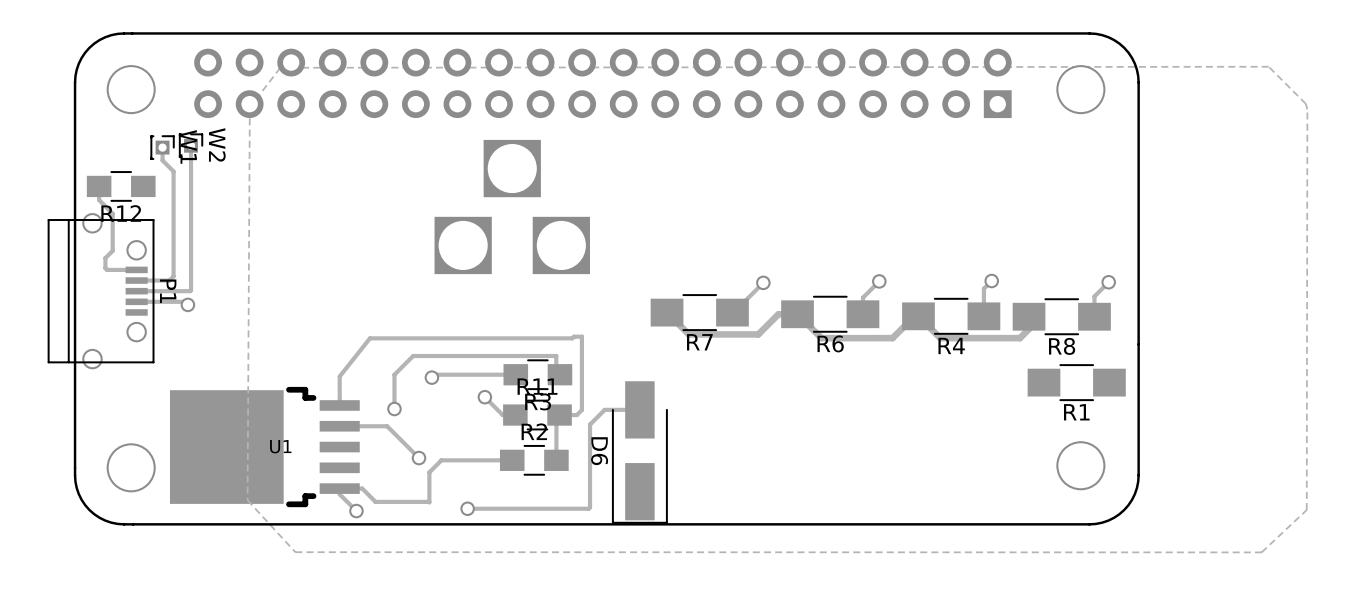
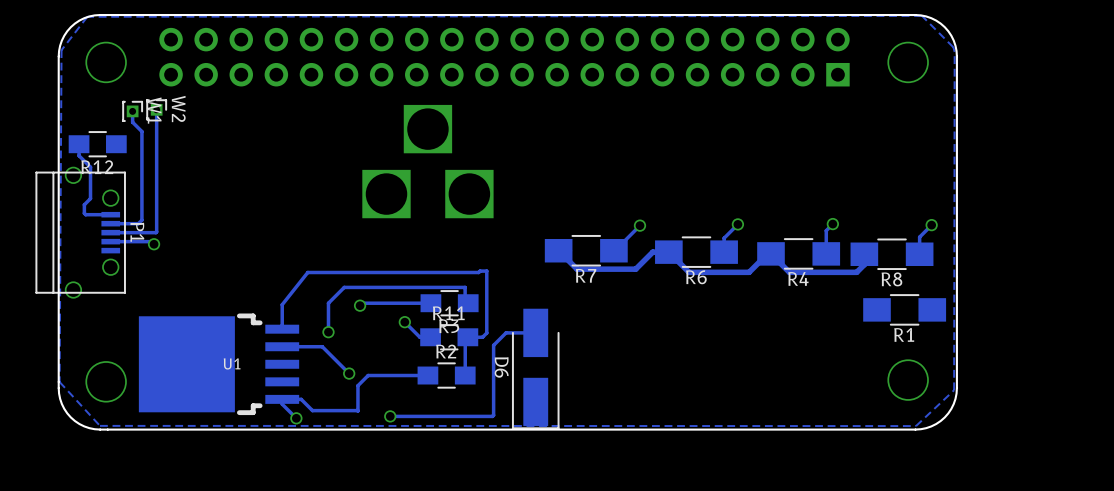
zone outline: (1268, 66) (280, 67) (249, 107) (247, 500) (295, 552) (1261, 552) (1306, 510) (1307, 109) (1305, 103) (1268, 66) -> (922, 15) (87, 16) (61, 50) (59, 382) (99, 425) (916, 426) (954, 390) (954, 51) (953, 47) (922, 15)

